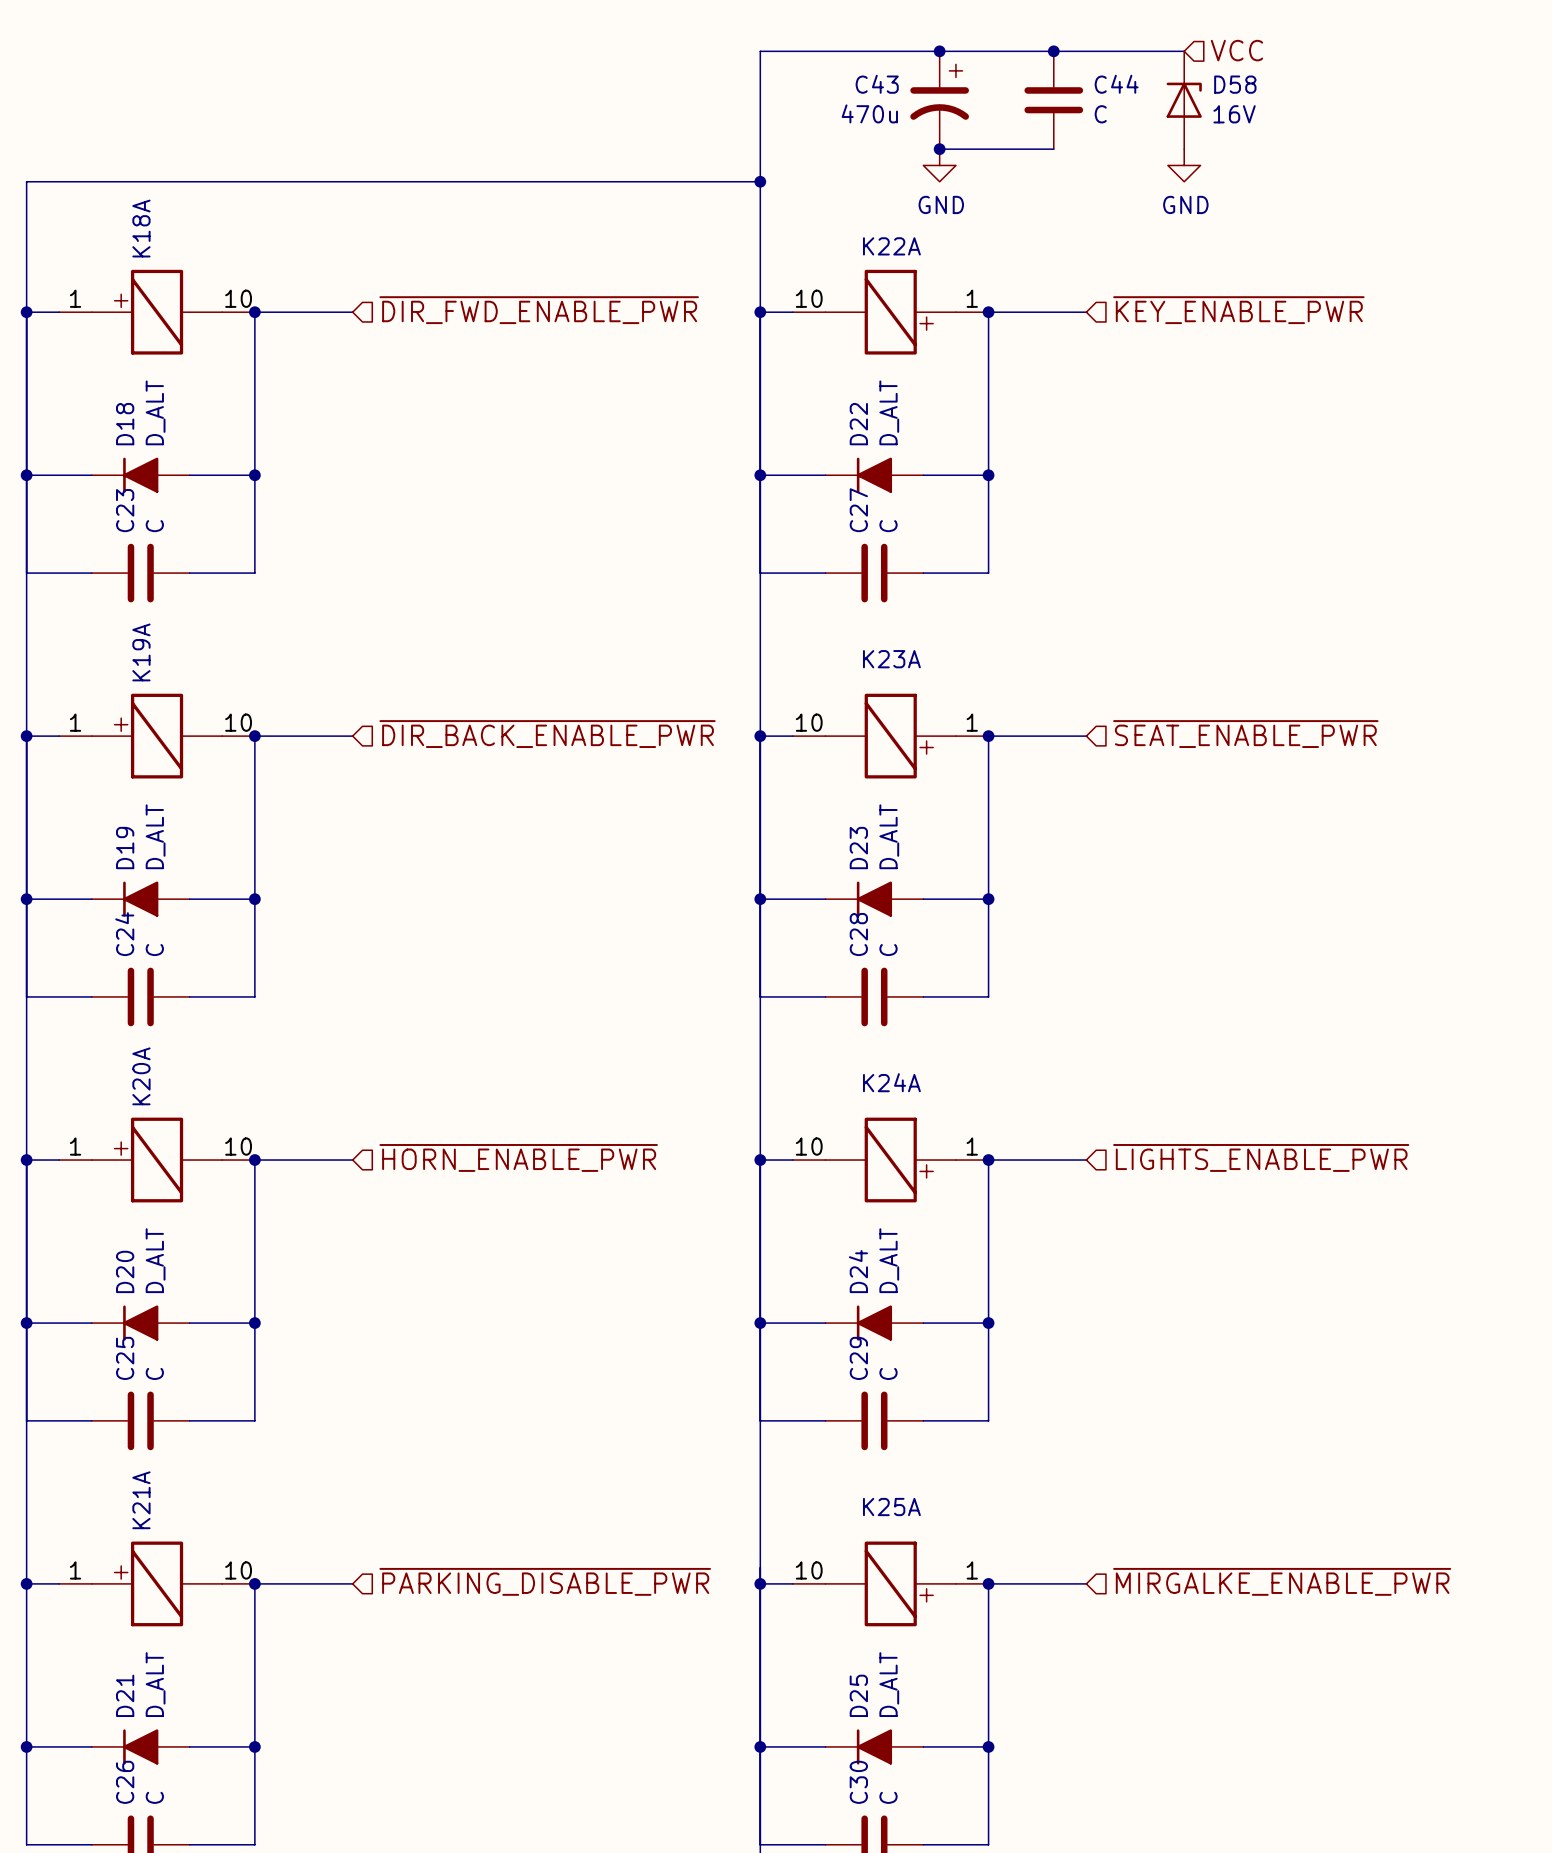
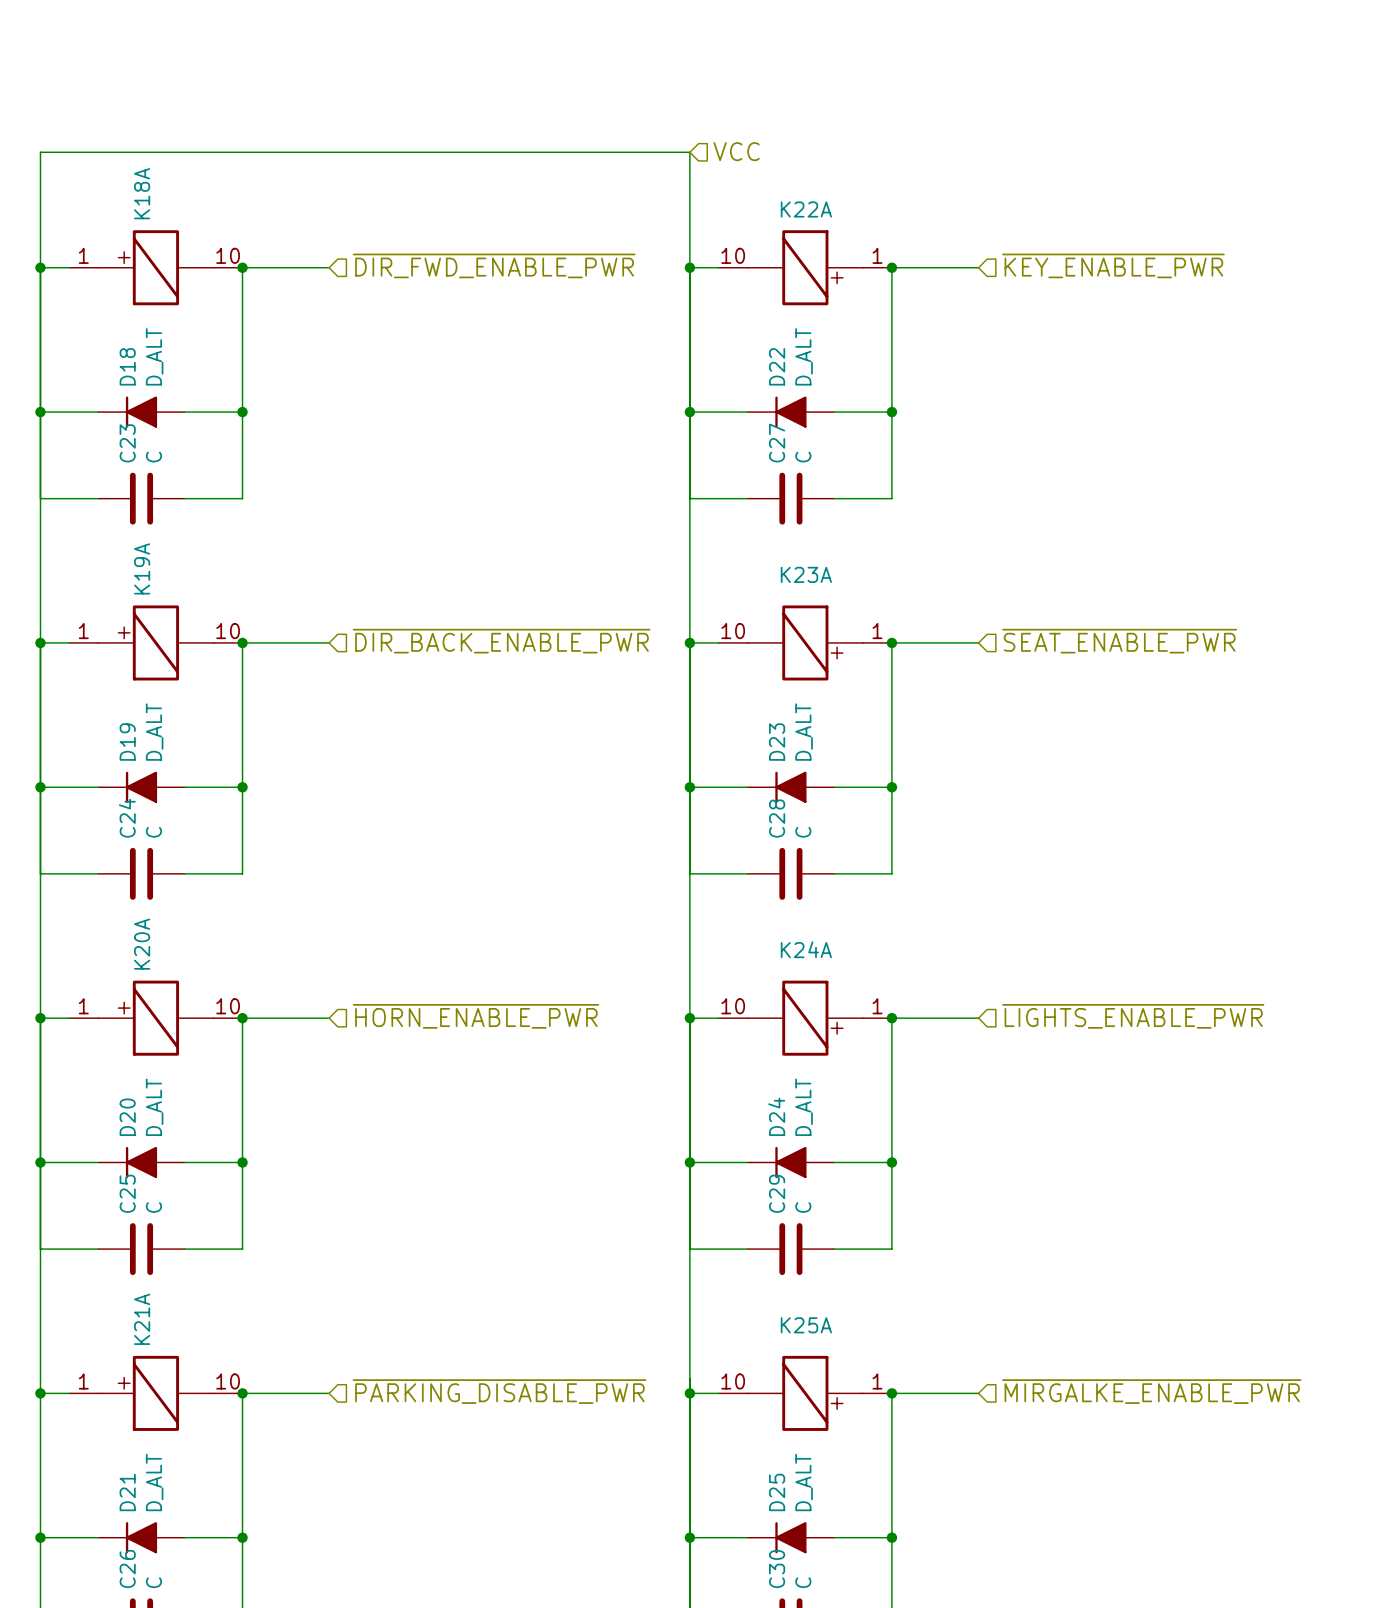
hierarchical label: VCC (1236, 50) -> none
junction: (939, 51) -> none
junction: (1053, 51) -> none
wire: (1184, 51) (760, 51) (760, 181) -> none
C43: 470u (939, 100) -> none
C44: C (1053, 100) -> none
D58: 16V (1184, 100) -> none
wire: (939, 149) (1053, 149) -> none
junction: (939, 149) -> none
power symbol: GND (939, 165) -> none
power symbol: GND (1184, 165) -> none
junction: (760, 181) -> none
hierarchical label: none -> VCC (736, 151)

